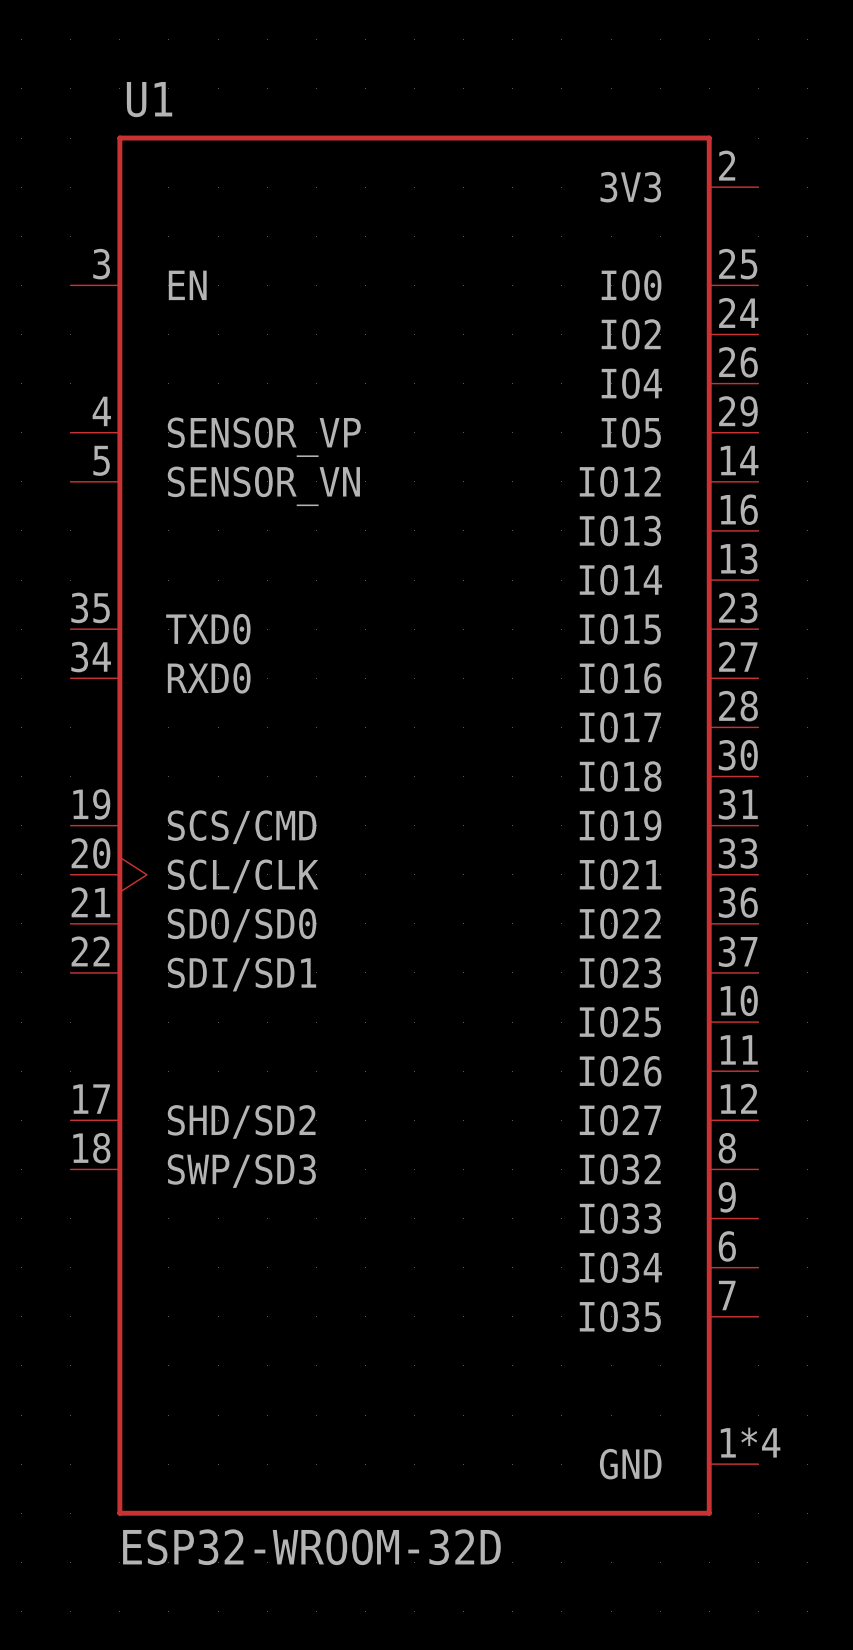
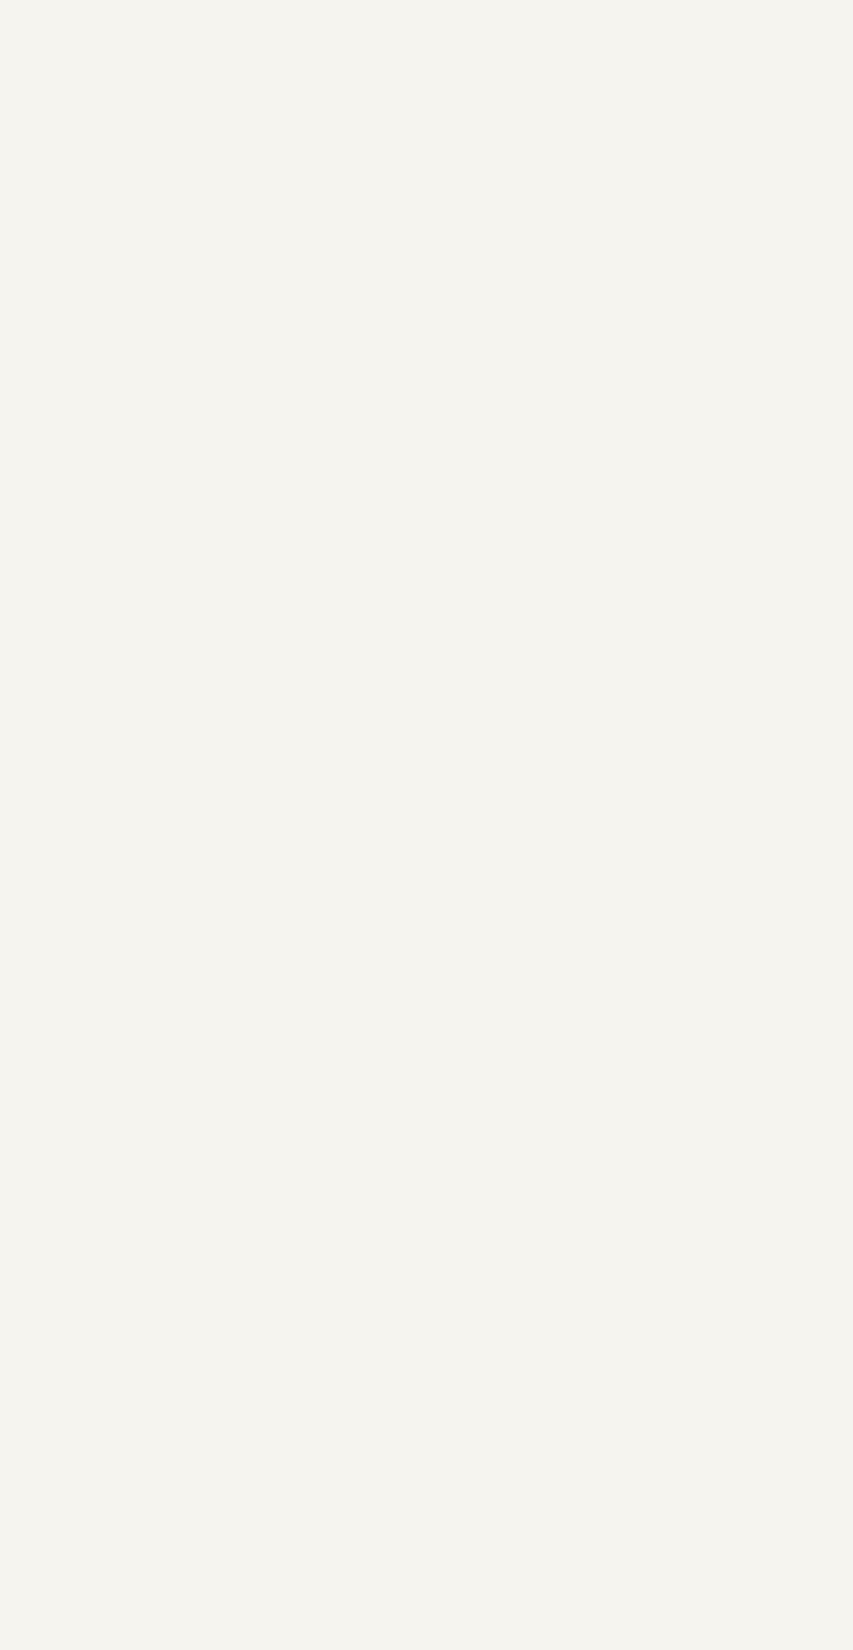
U1: ESP32-WROOM-32D (414, 825) -> none

